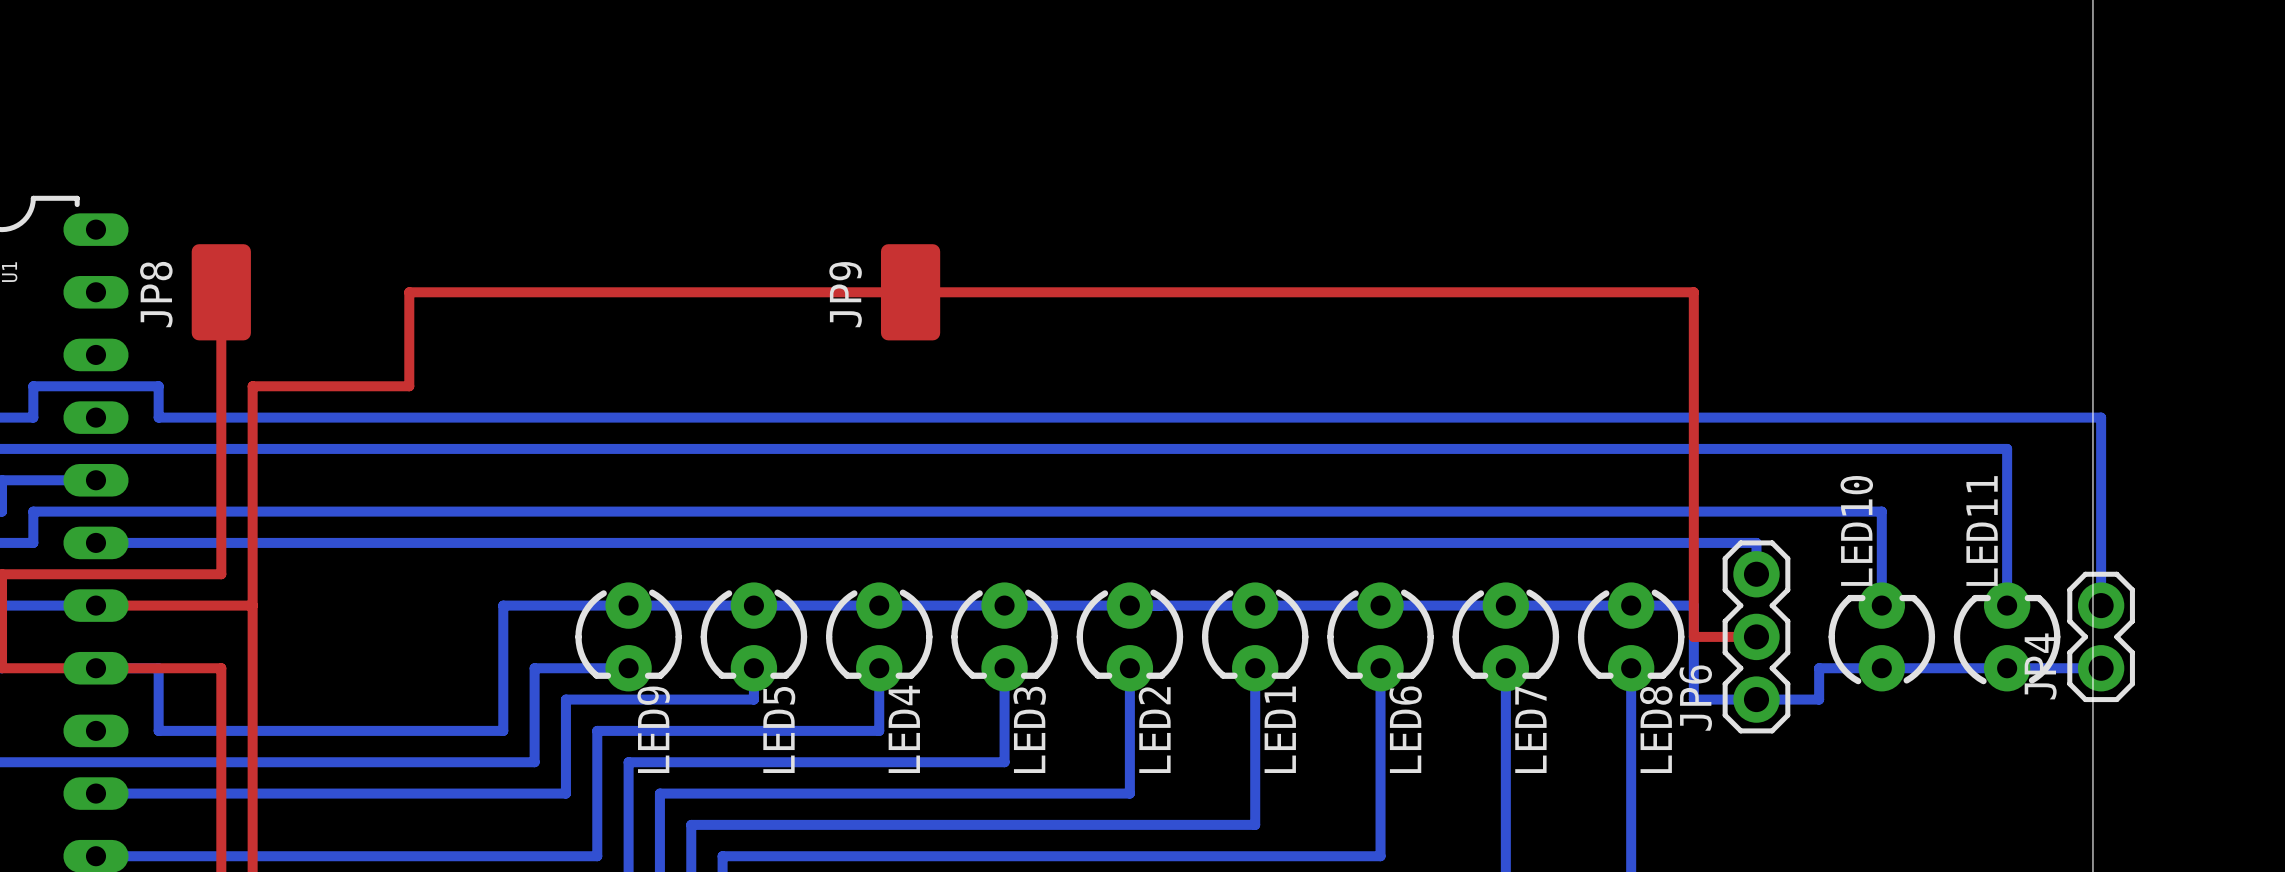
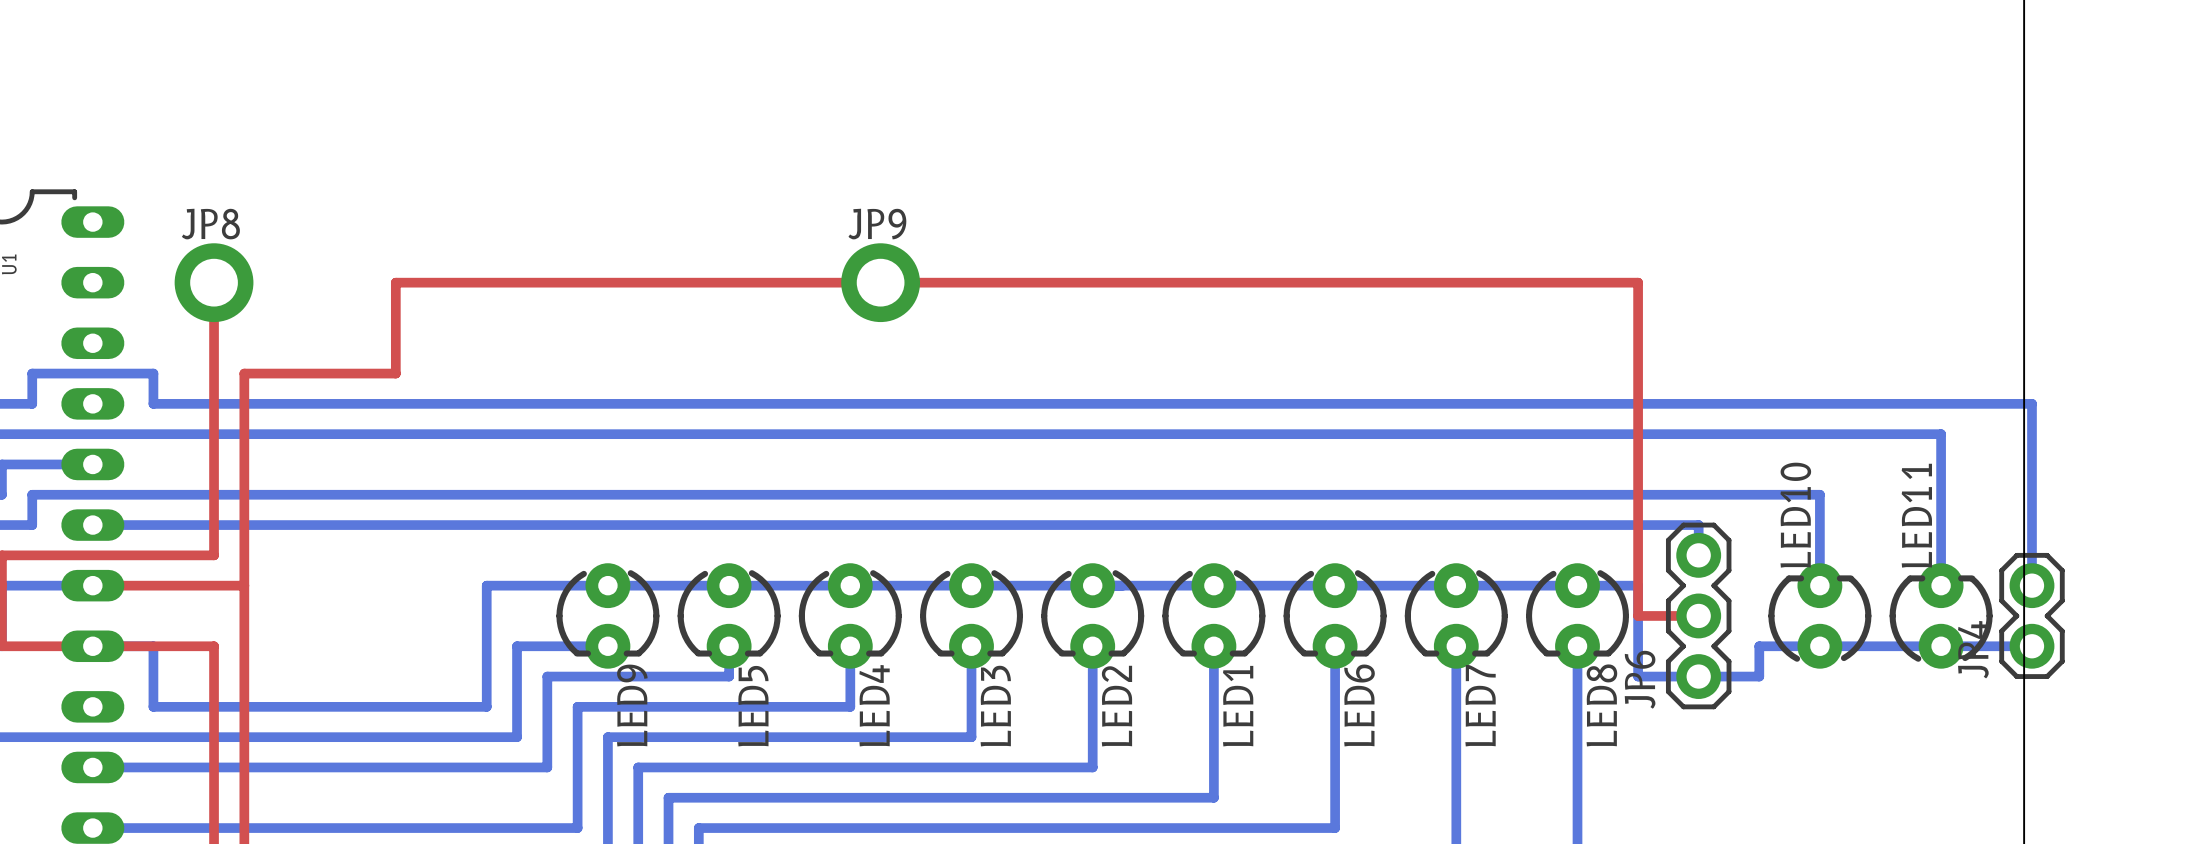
JP8 footprint: [191, 244, 251, 341] -> [174, 243, 254, 323]
JP9 footprint: [880, 244, 941, 341] -> [841, 243, 921, 323]
JP8 name position: JP8 (156, 294) -> JP8 (210, 224)
JP9 name position: JP9 (845, 294) -> JP9 (877, 224)

